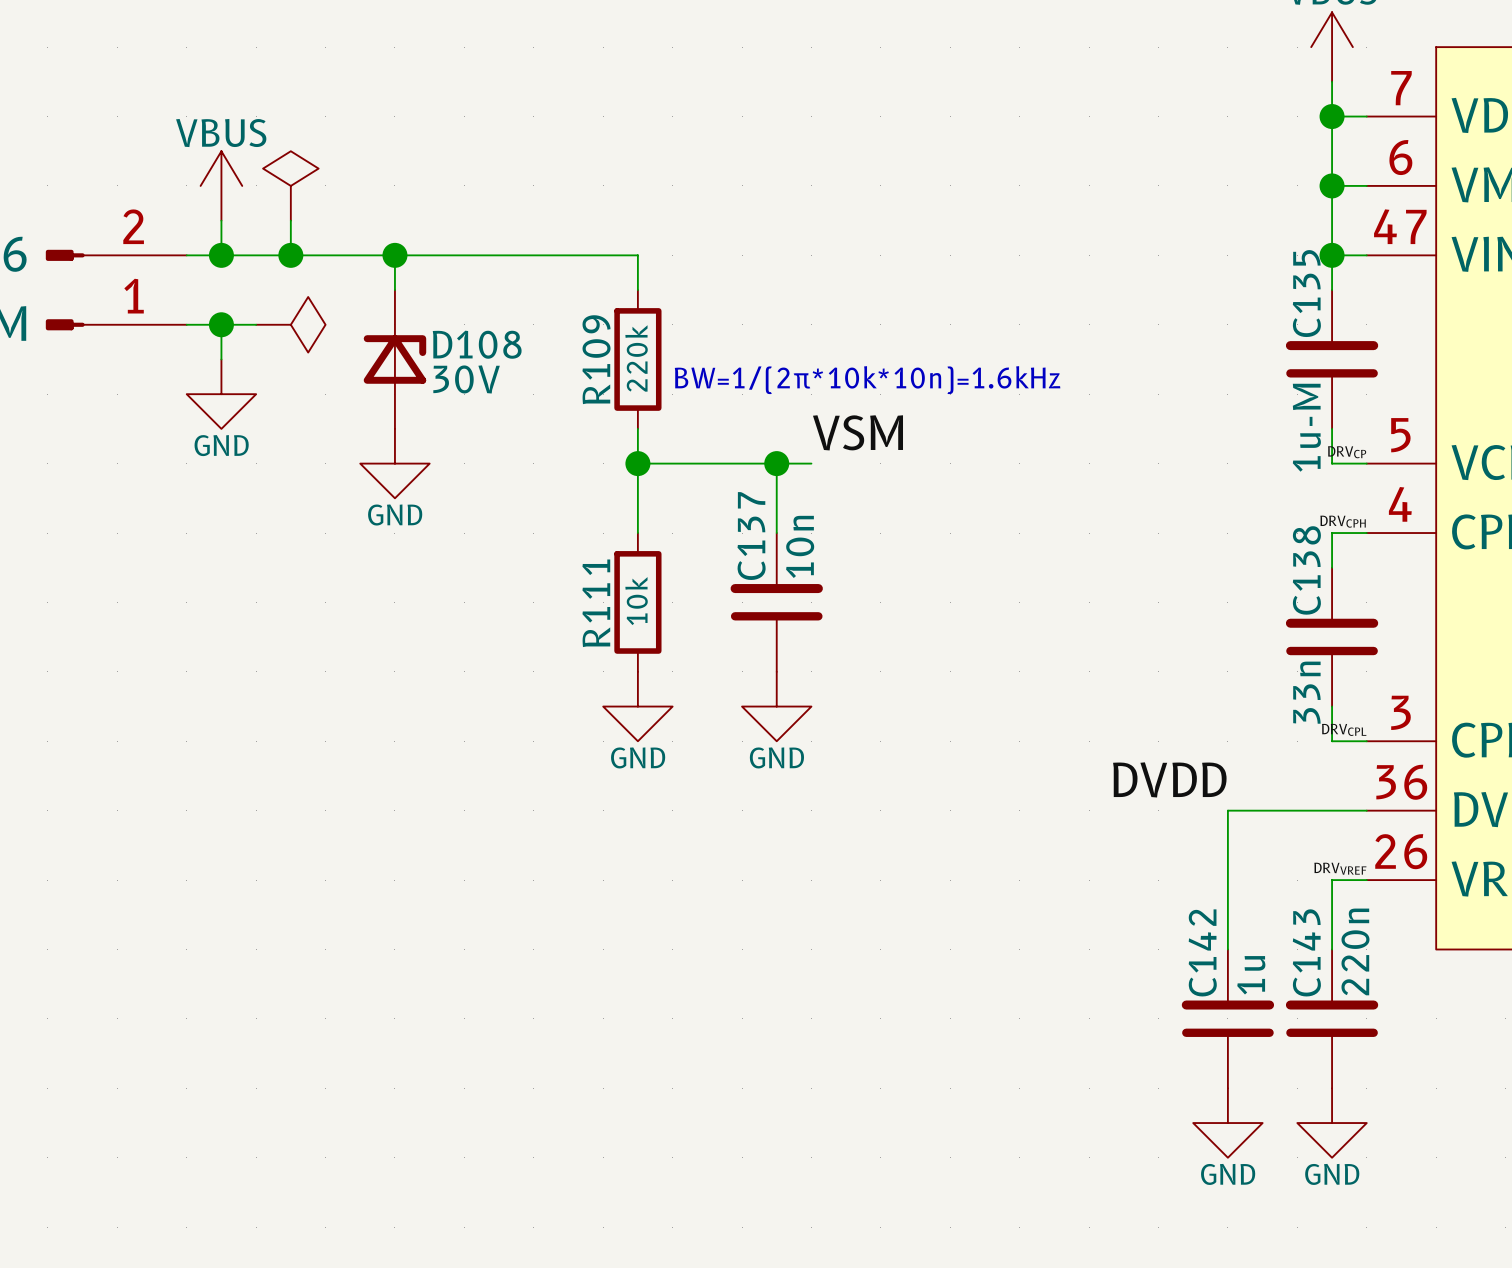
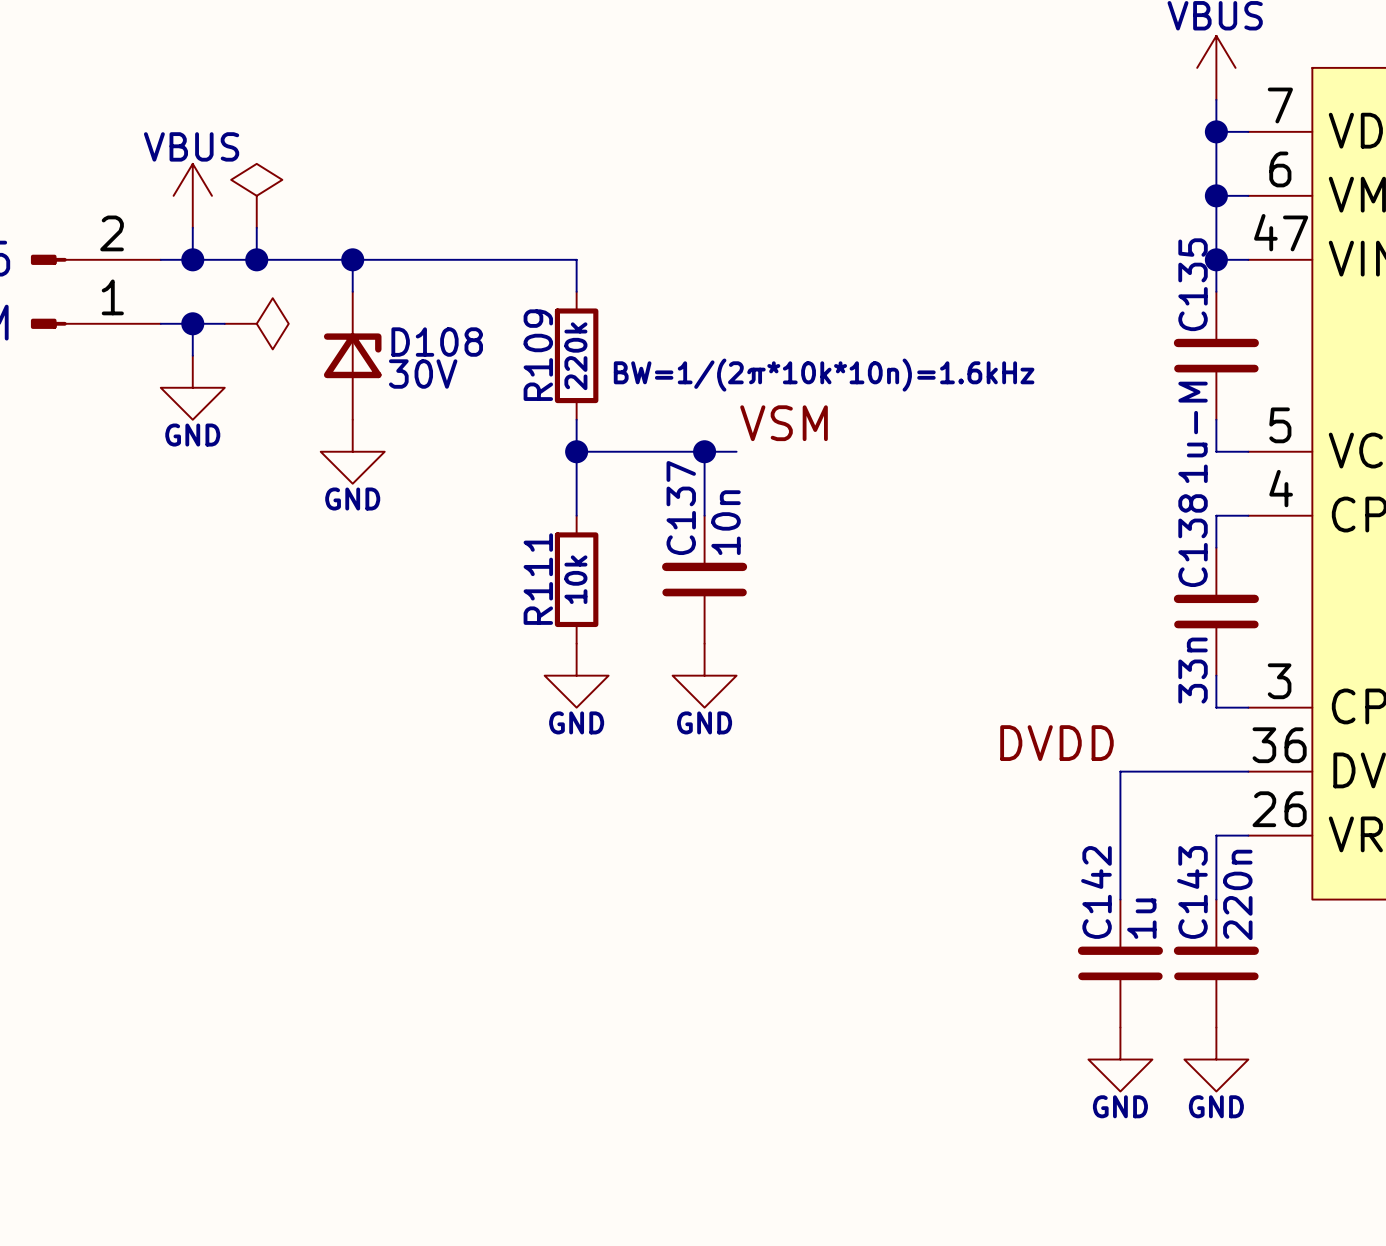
label: DRVCP (1347, 452) -> none
label: DRVCPH (1343, 521) -> none
label: DRVCPL (1344, 729) -> none
label: DRVVREF (1340, 868) -> none

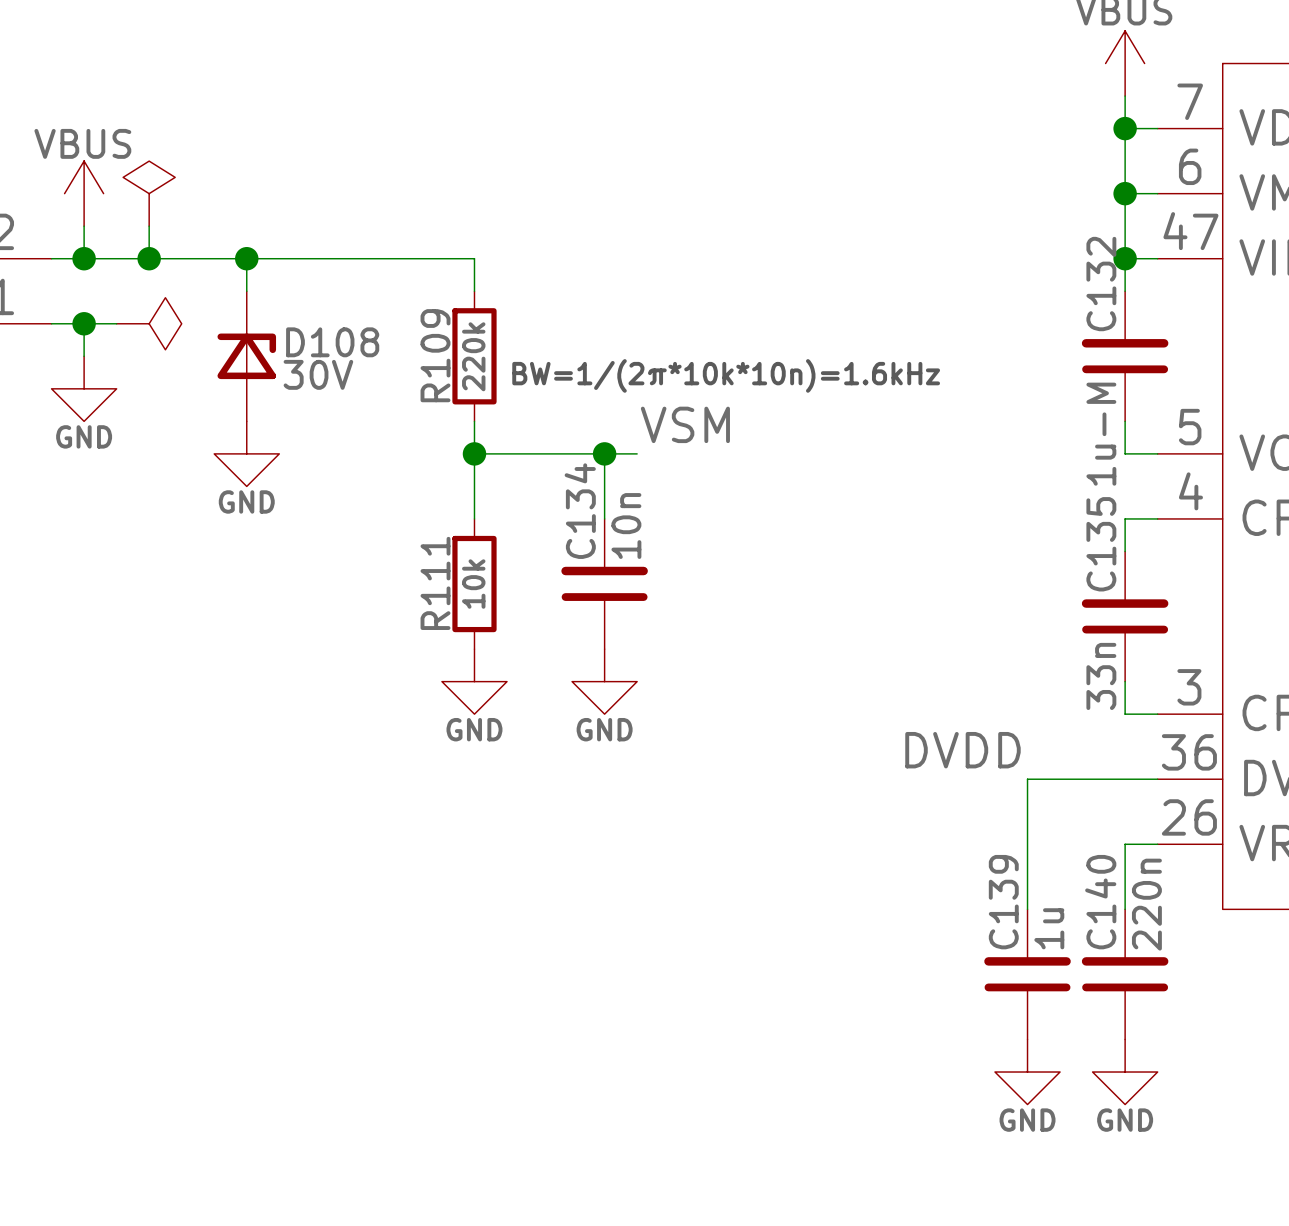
C135 name: C135 (1193, 284) -> C132 (1101, 284)
C137 name: C137 (681, 508) -> C134 (580, 511)
C138 name: C138 (1193, 540) -> C135 (1101, 544)
C142 name: C142 (1096, 892) -> C139 (1003, 902)
C143 name: C143 (1192, 892) -> C140 (1100, 902)

